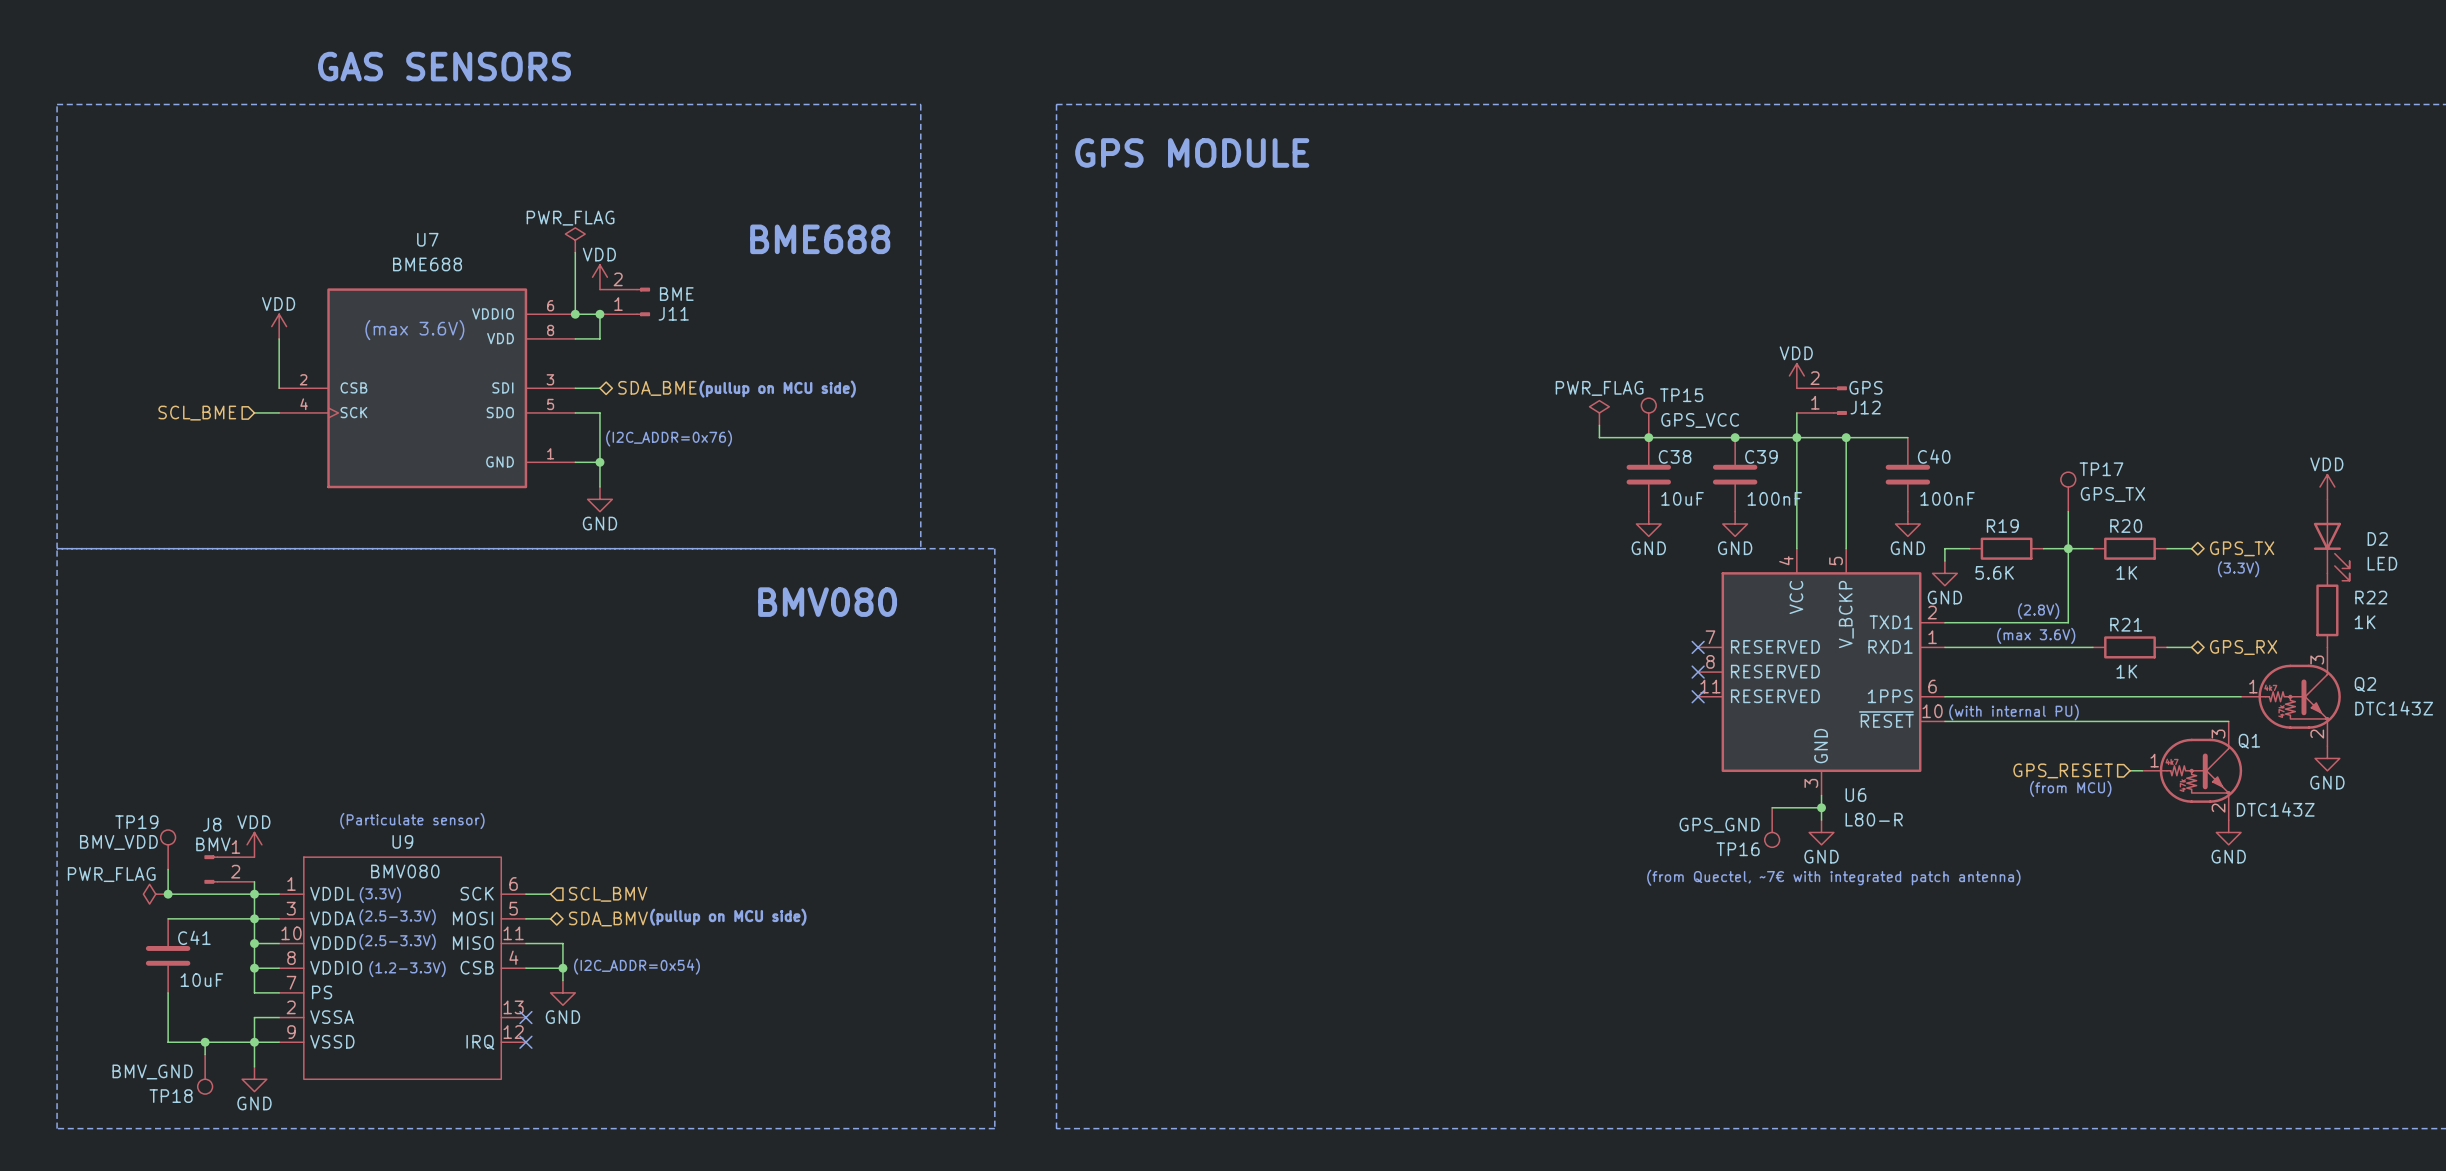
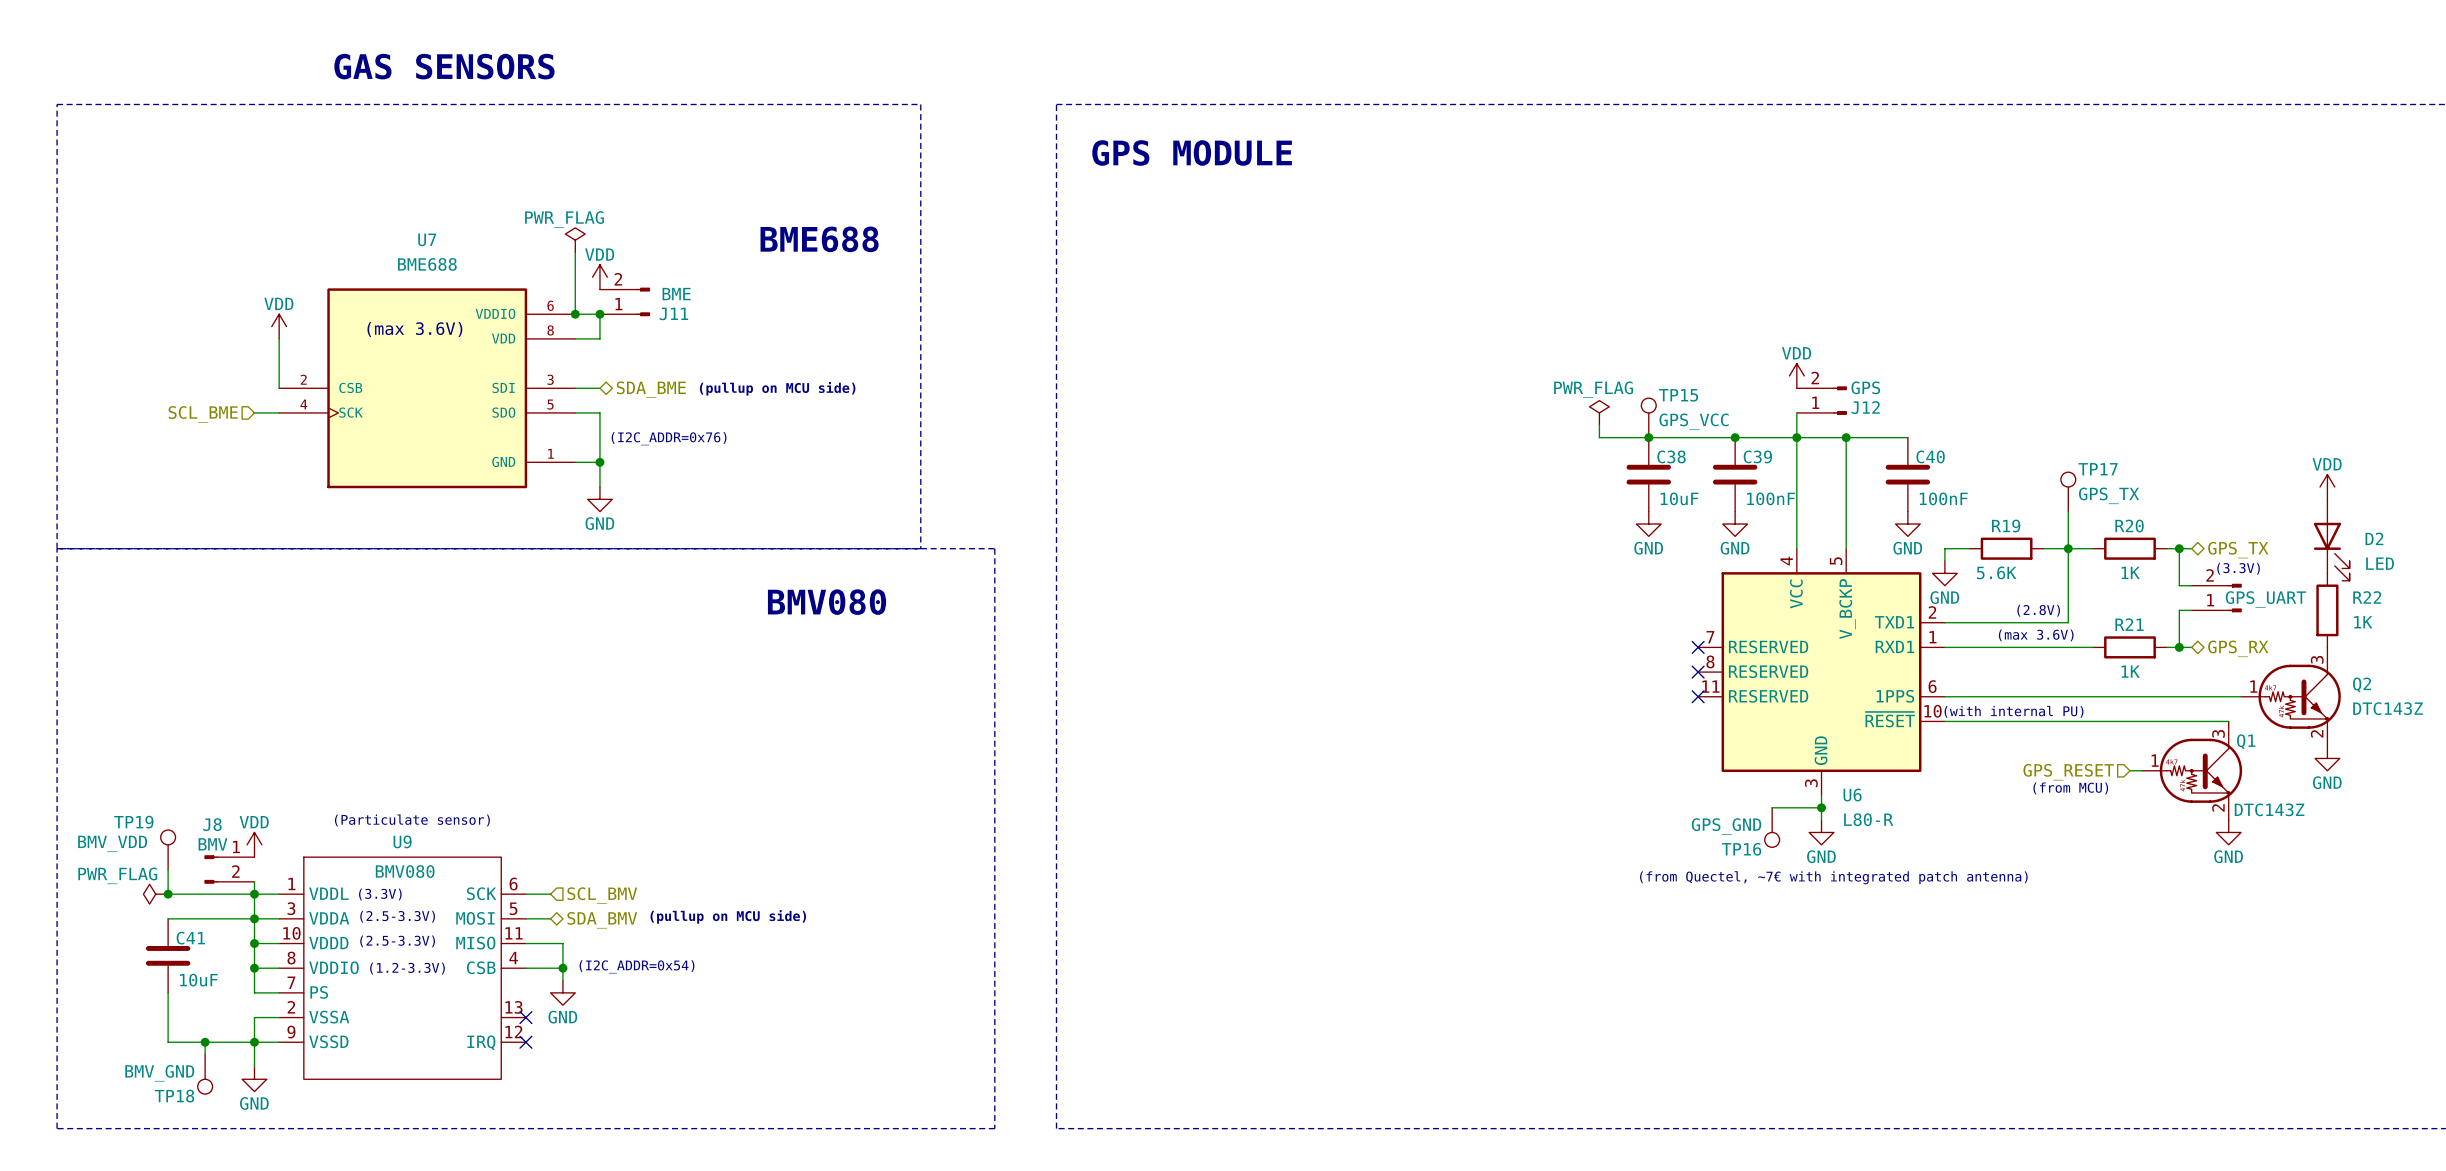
wire: none -> (2179, 548) (2179, 585) (2191, 585)
junction: none -> (2179, 548)
part: none -> GPS_UART (2216, 598)
wire: none -> (2191, 610) (2179, 610) (2179, 647)
junction: none -> (2179, 647)

